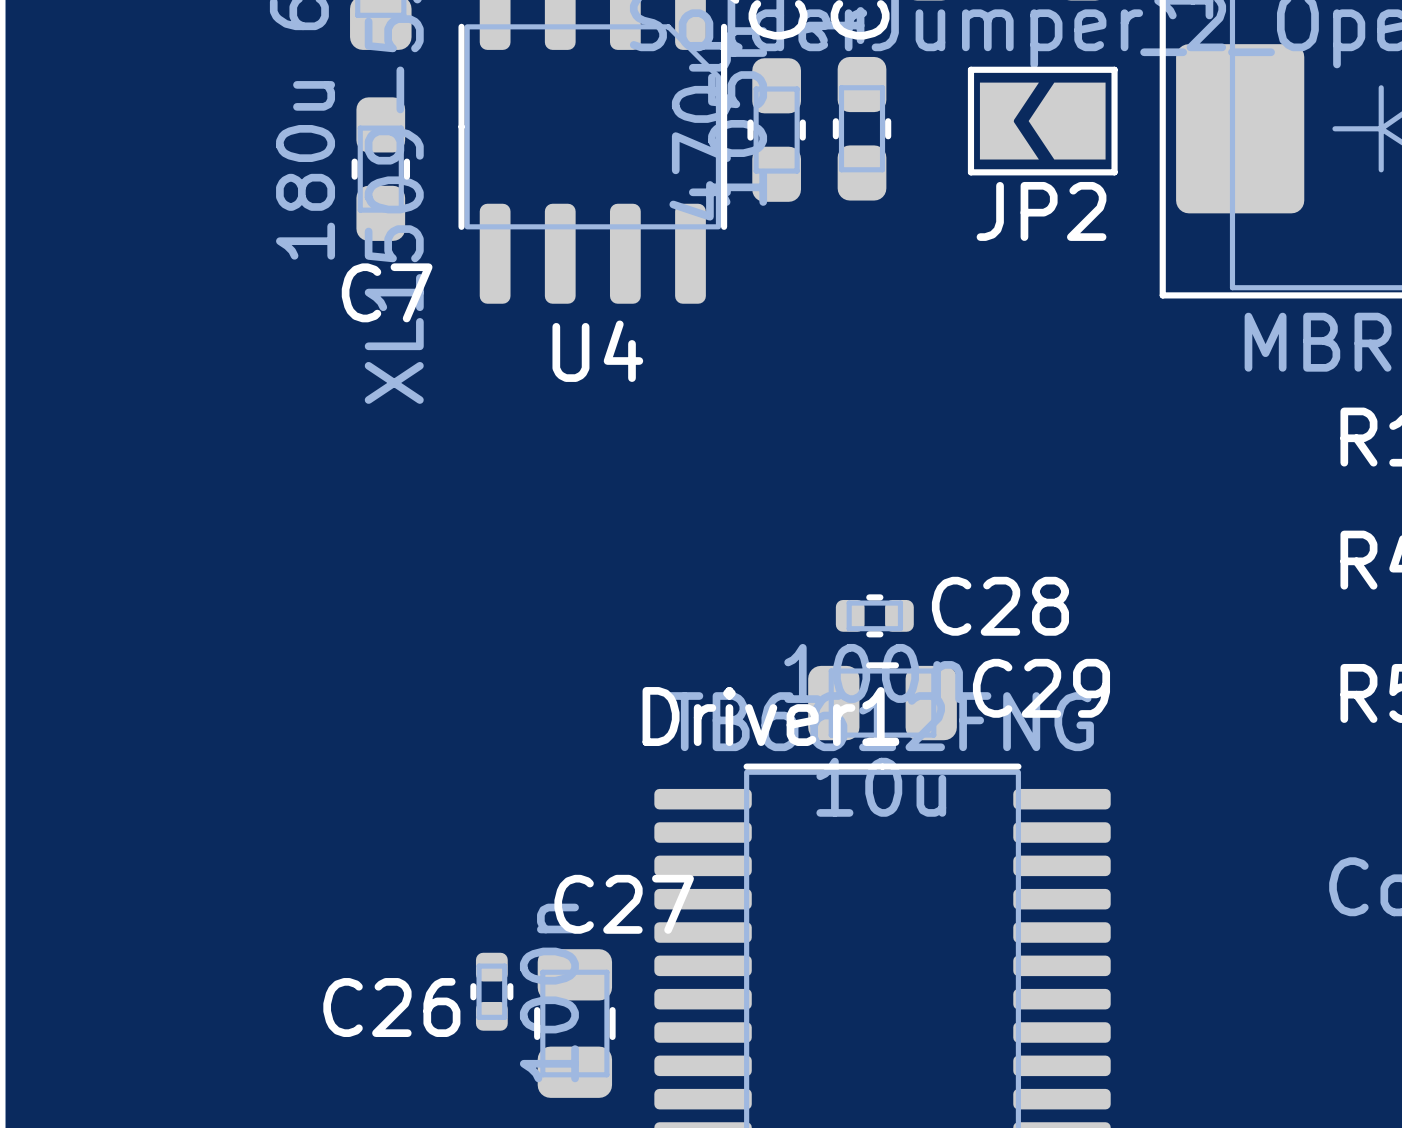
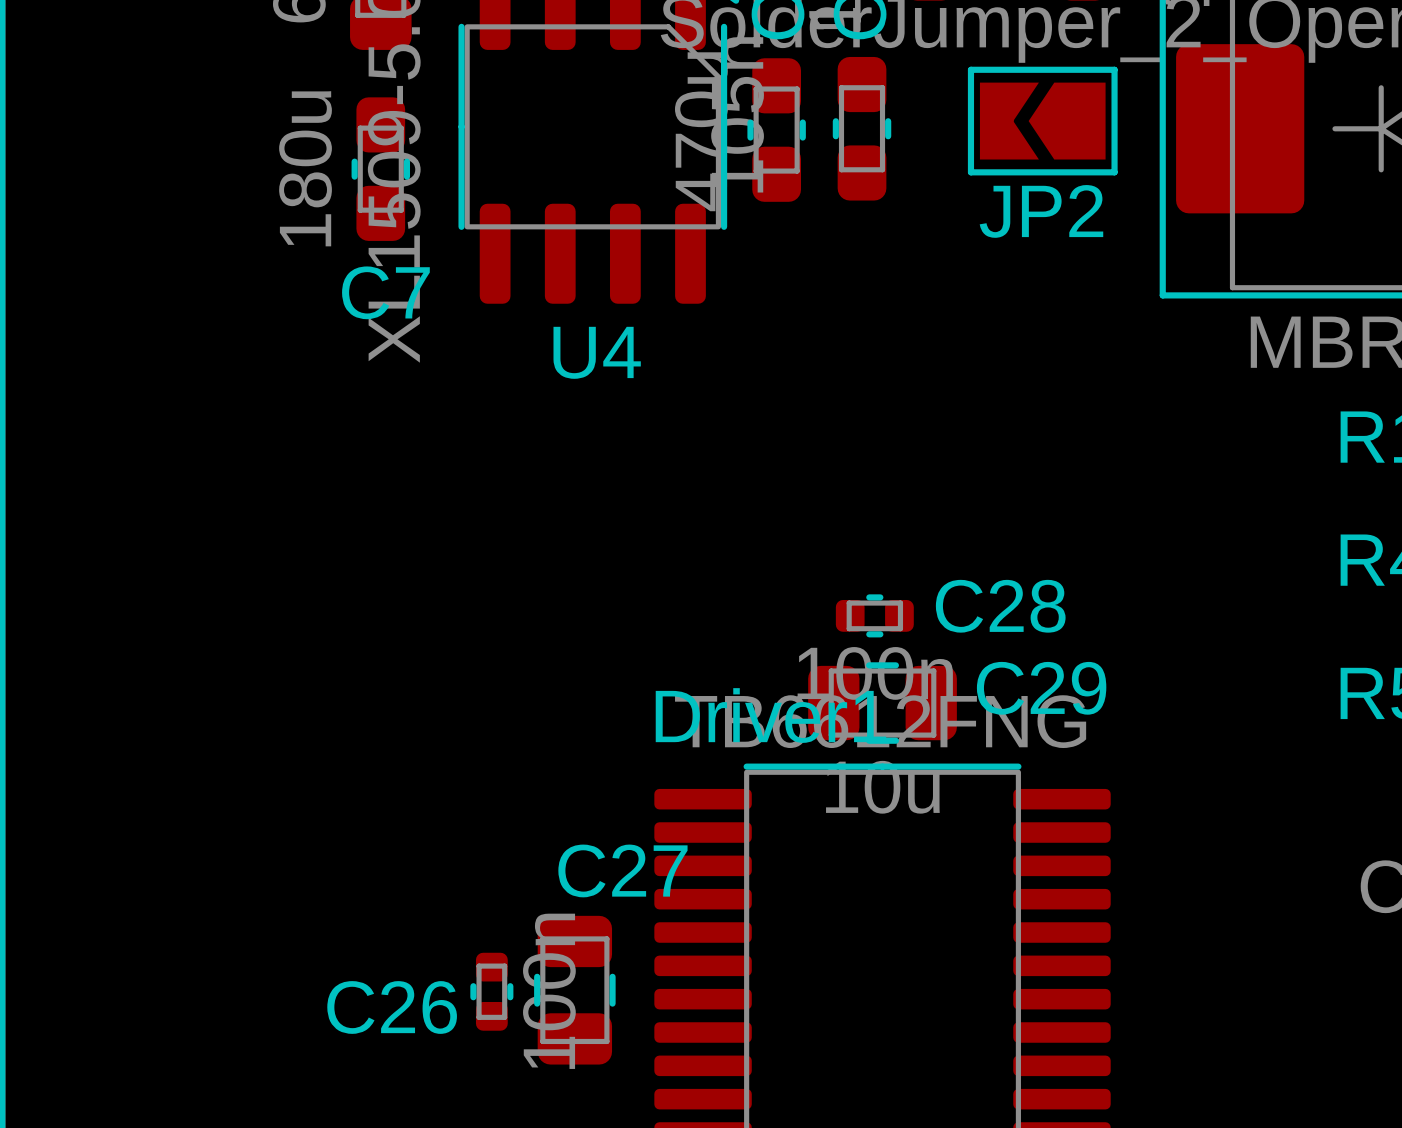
C27 position: (574, 1023) -> (574, 990)

